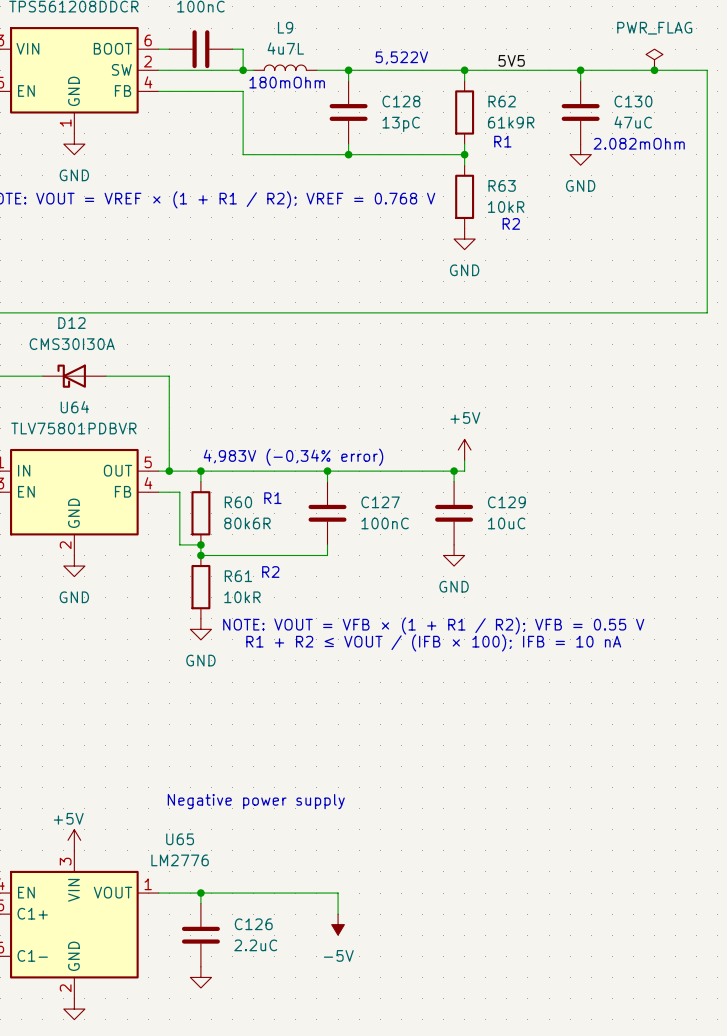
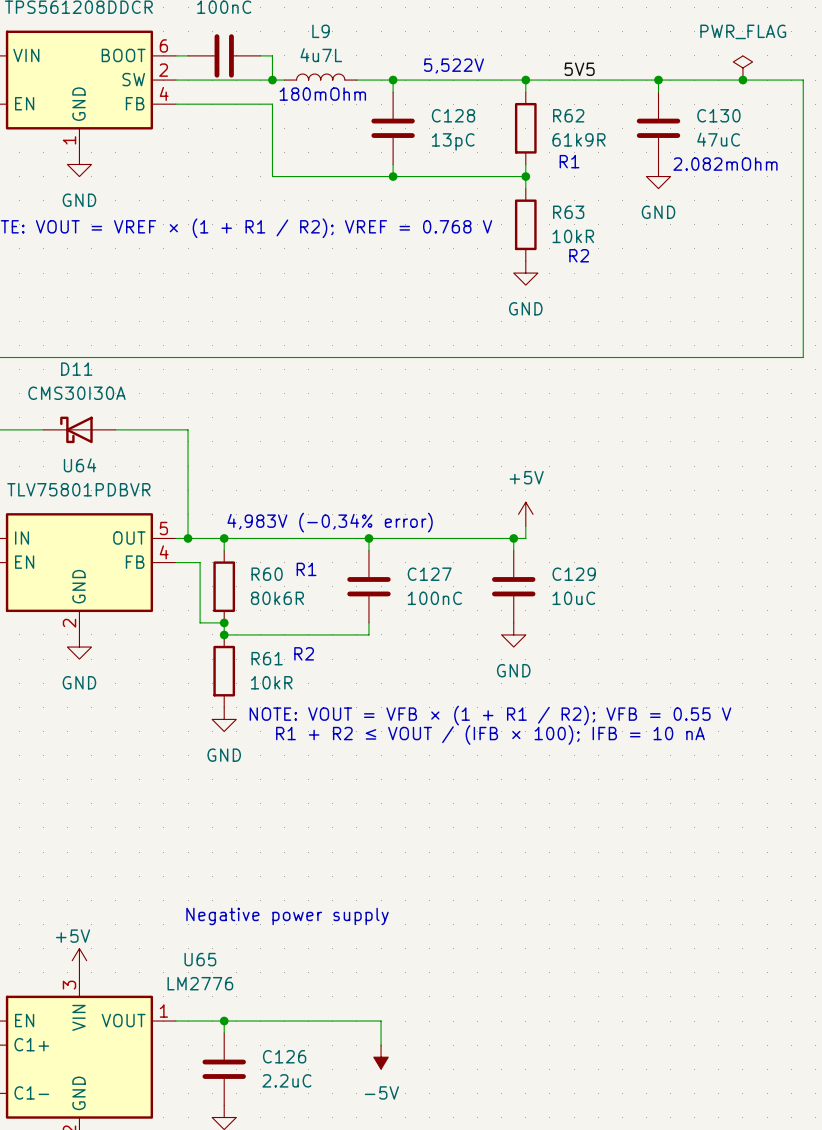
D12 name: D12 (71, 323) -> D11 (76, 369)

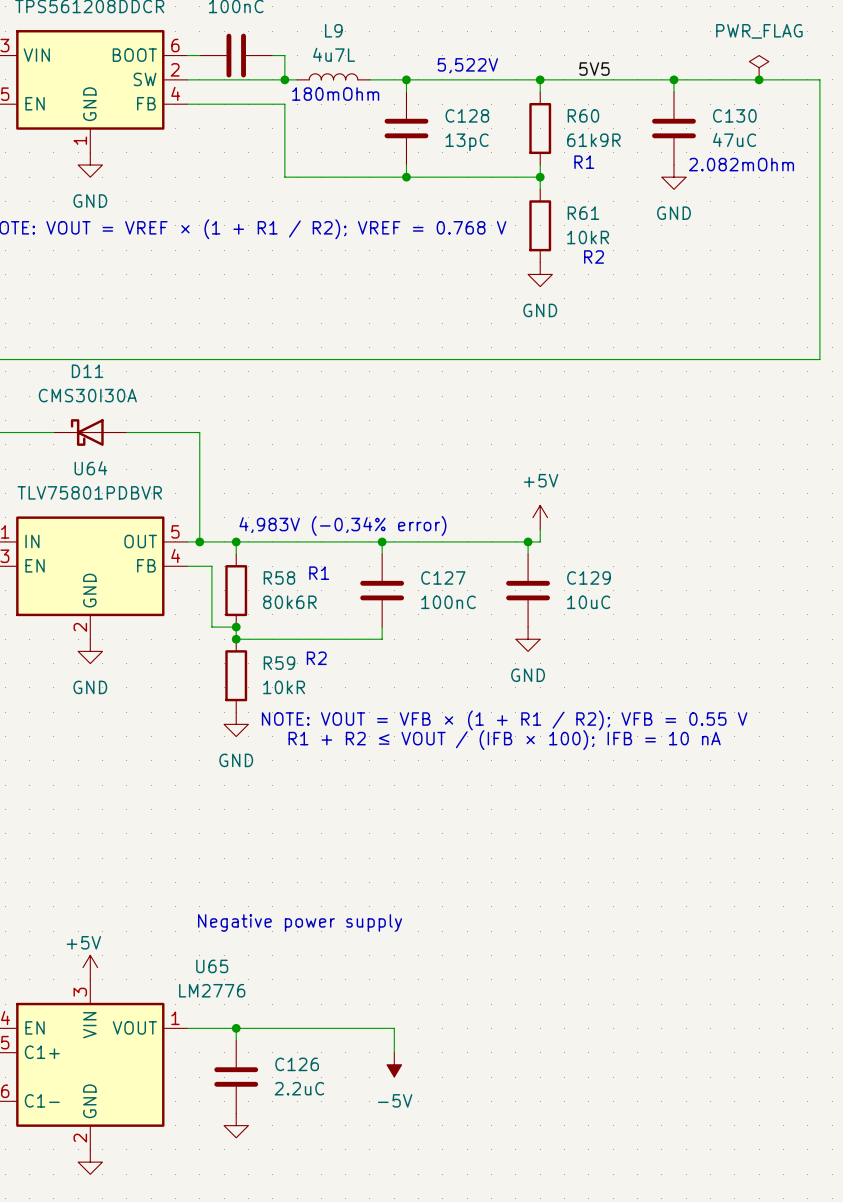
R62 name: R62 (568, 115) -> R60 (583, 115)
R63 name: R63 (568, 212) -> R61 (583, 213)
R60 name: R60 (267, 574) -> R58 (279, 577)
R61 name: R61 (267, 658) -> R59 (279, 663)

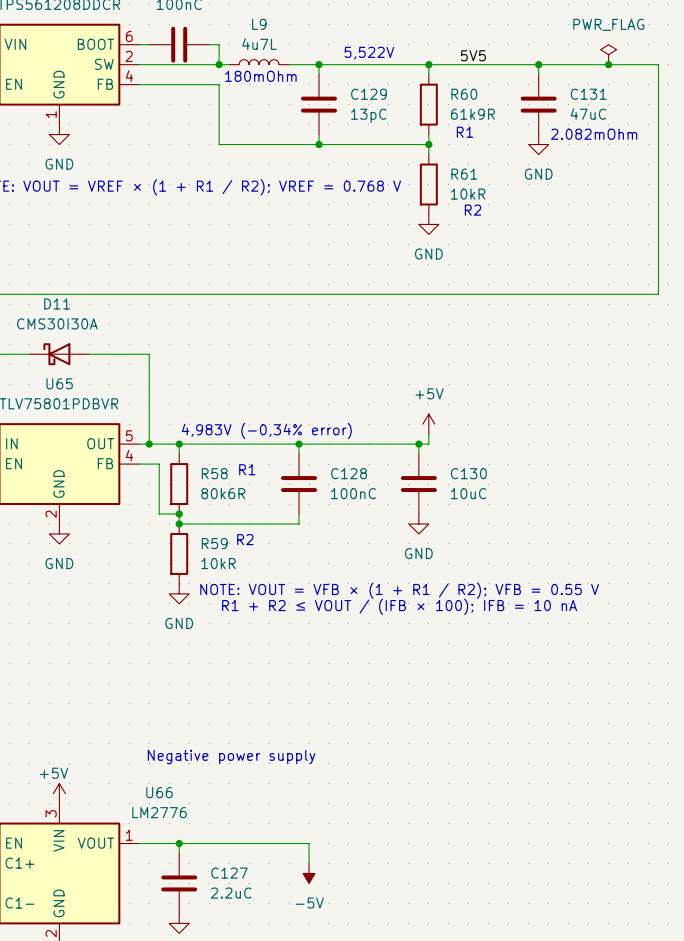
C128 name: C128 (467, 115) -> C129 (369, 94)
C130 name: C130 (734, 115) -> C131 (588, 94)
U64 name: U64 (90, 468) -> U65 (59, 383)
C127 name: C127 (443, 577) -> C128 (349, 473)
C129 name: C129 (588, 577) -> C130 (468, 473)
U65 name: U65 (212, 966) -> U66 (159, 792)
C126 name: C126 (297, 1064) -> C127 (229, 873)

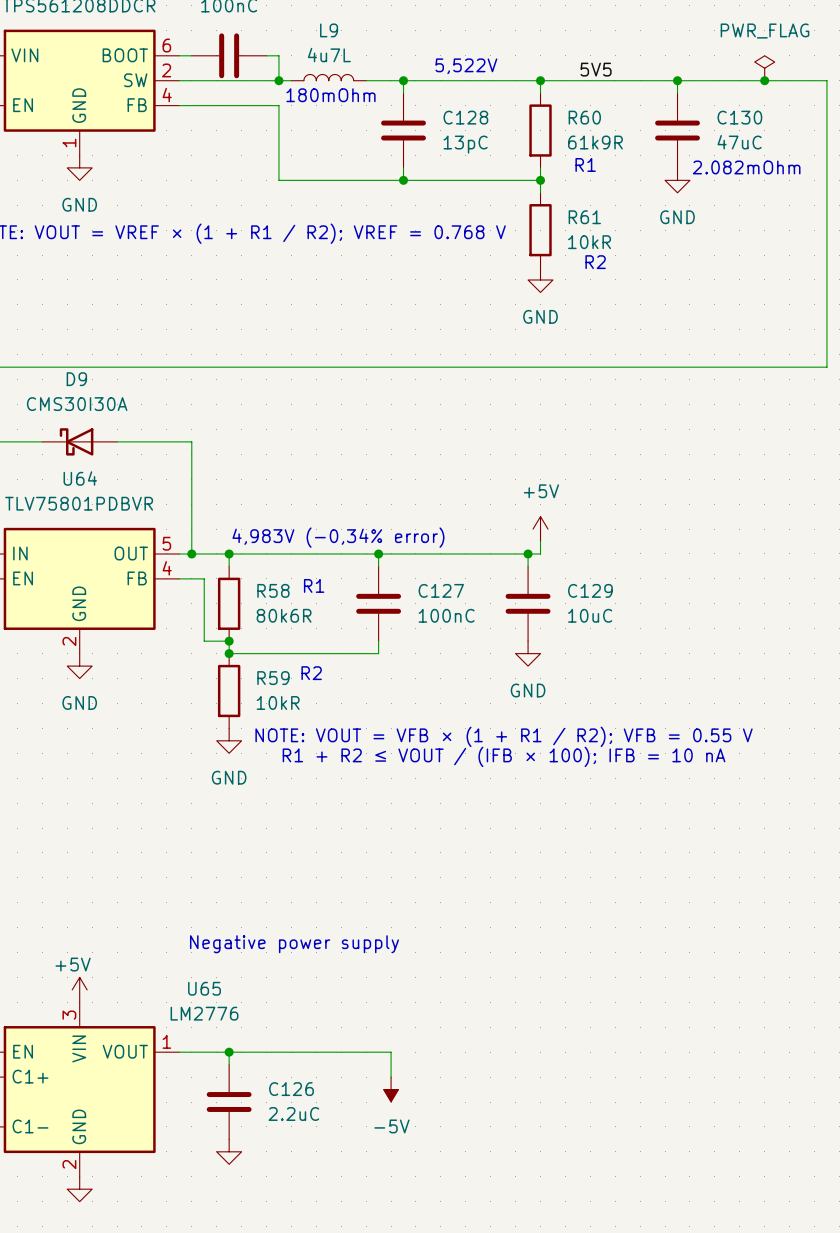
C129 name: C129 (369, 94) -> C128 (465, 117)
C131 name: C131 (588, 94) -> C130 (739, 117)
D11 name: D11 (57, 303) -> D9 (76, 379)
U65 name: U65 (59, 383) -> U64 (80, 478)
C128 name: C128 (349, 473) -> C127 (441, 590)
C130 name: C130 (468, 473) -> C129 (590, 590)
U66 name: U66 (159, 792) -> U65 (204, 988)
C127 name: C127 (229, 873) -> C126 (291, 1089)

